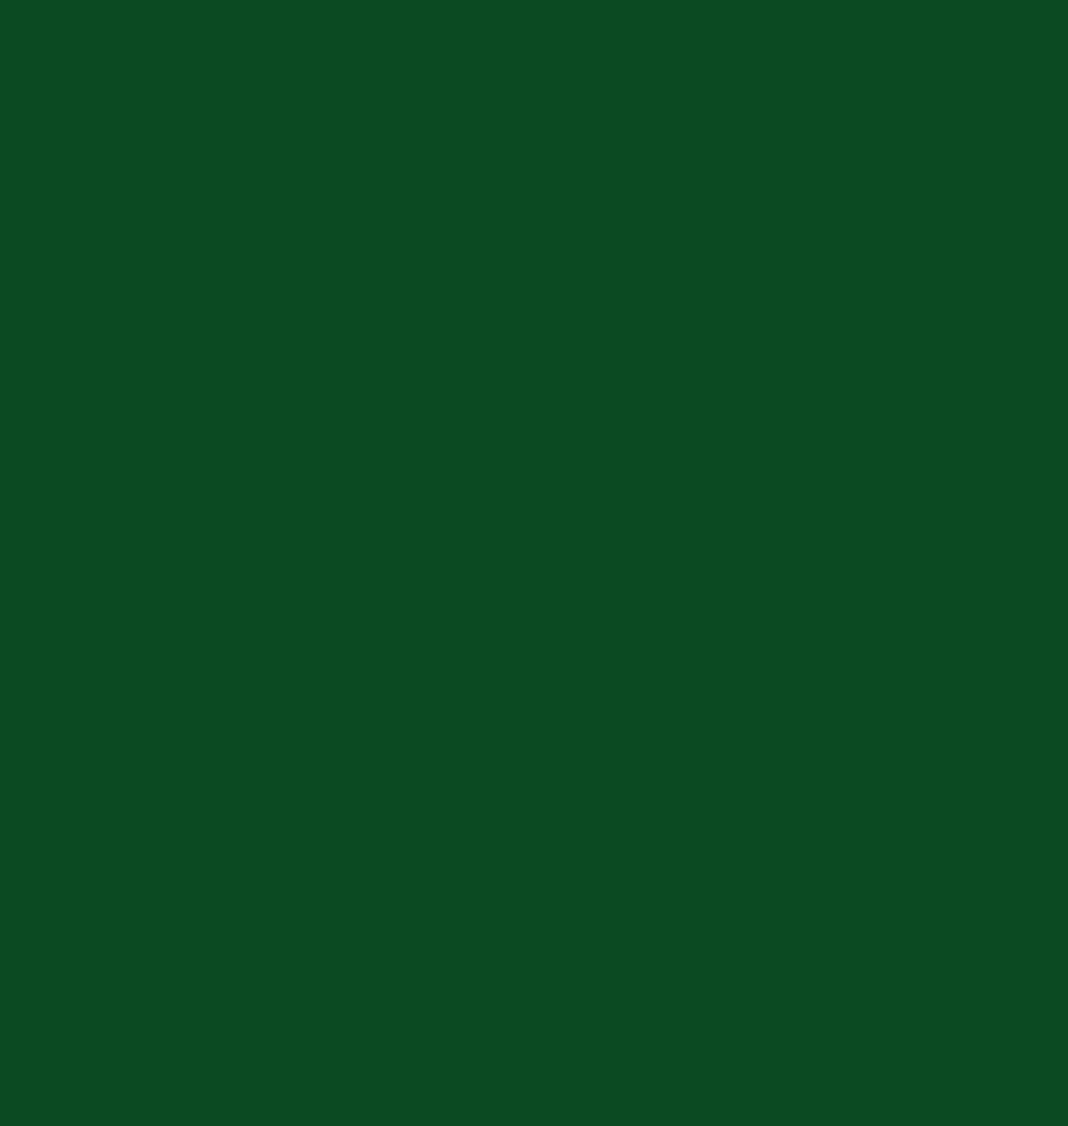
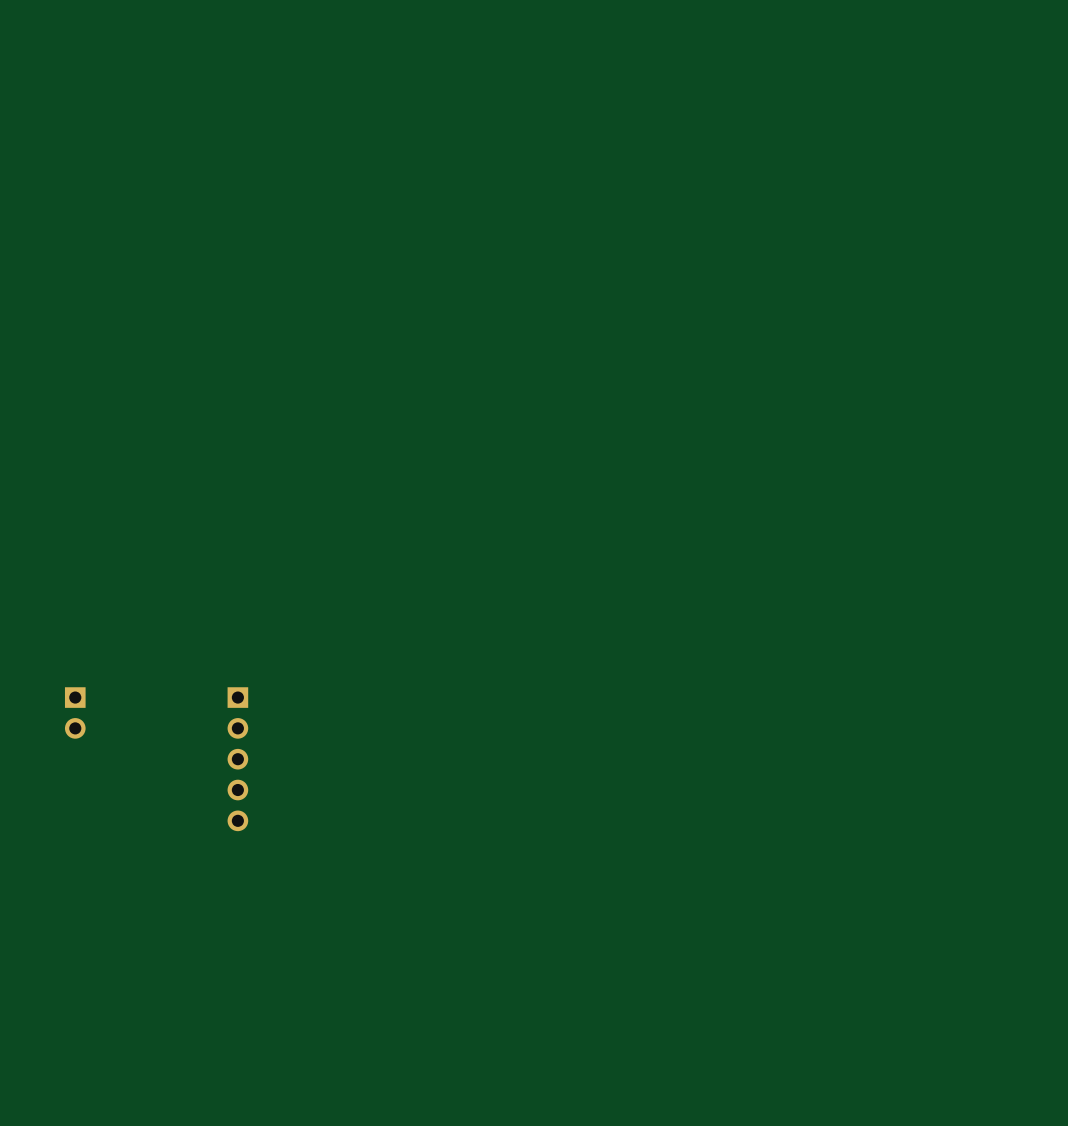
part: none -> (75, 712)
part: none -> (237, 759)

